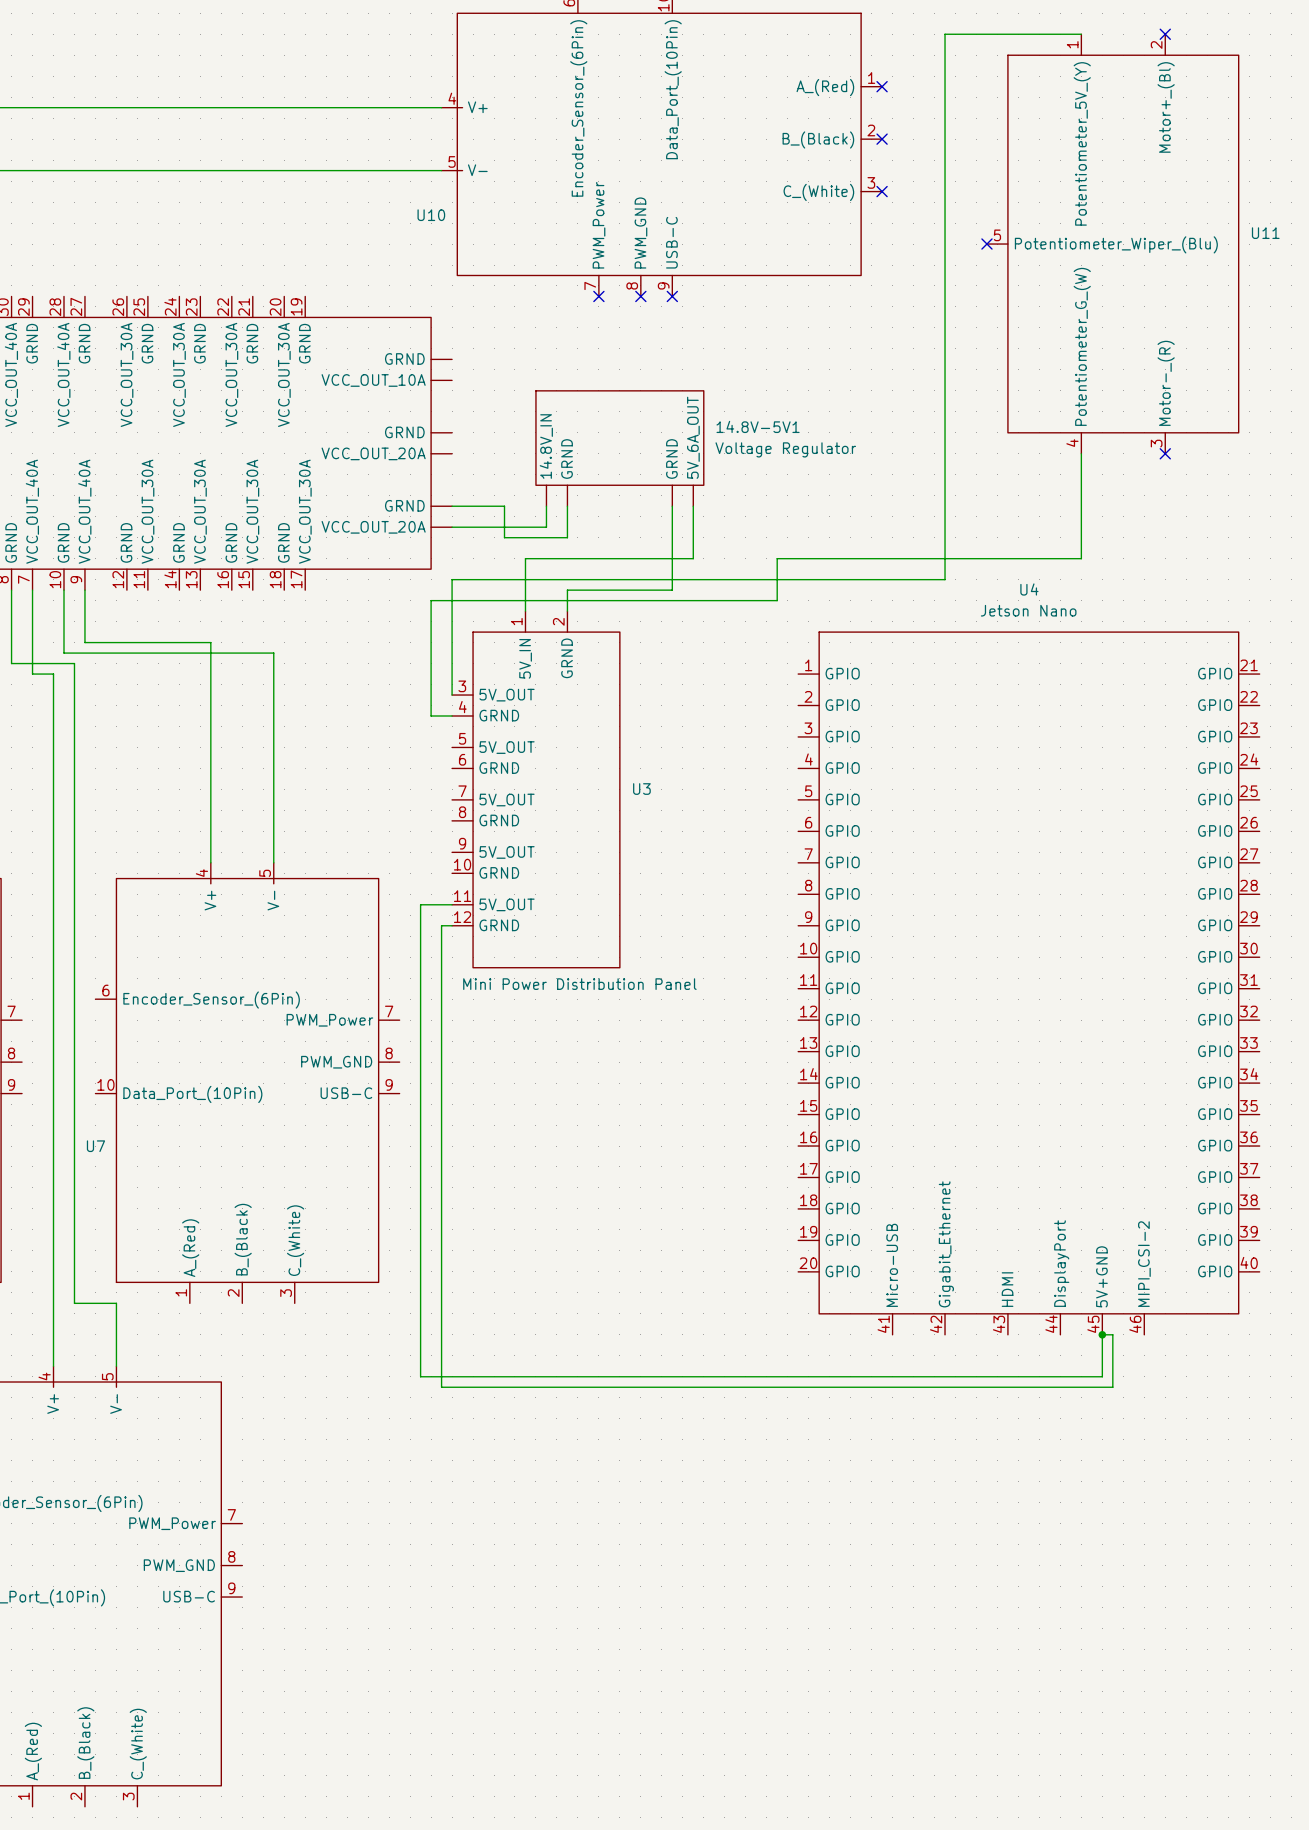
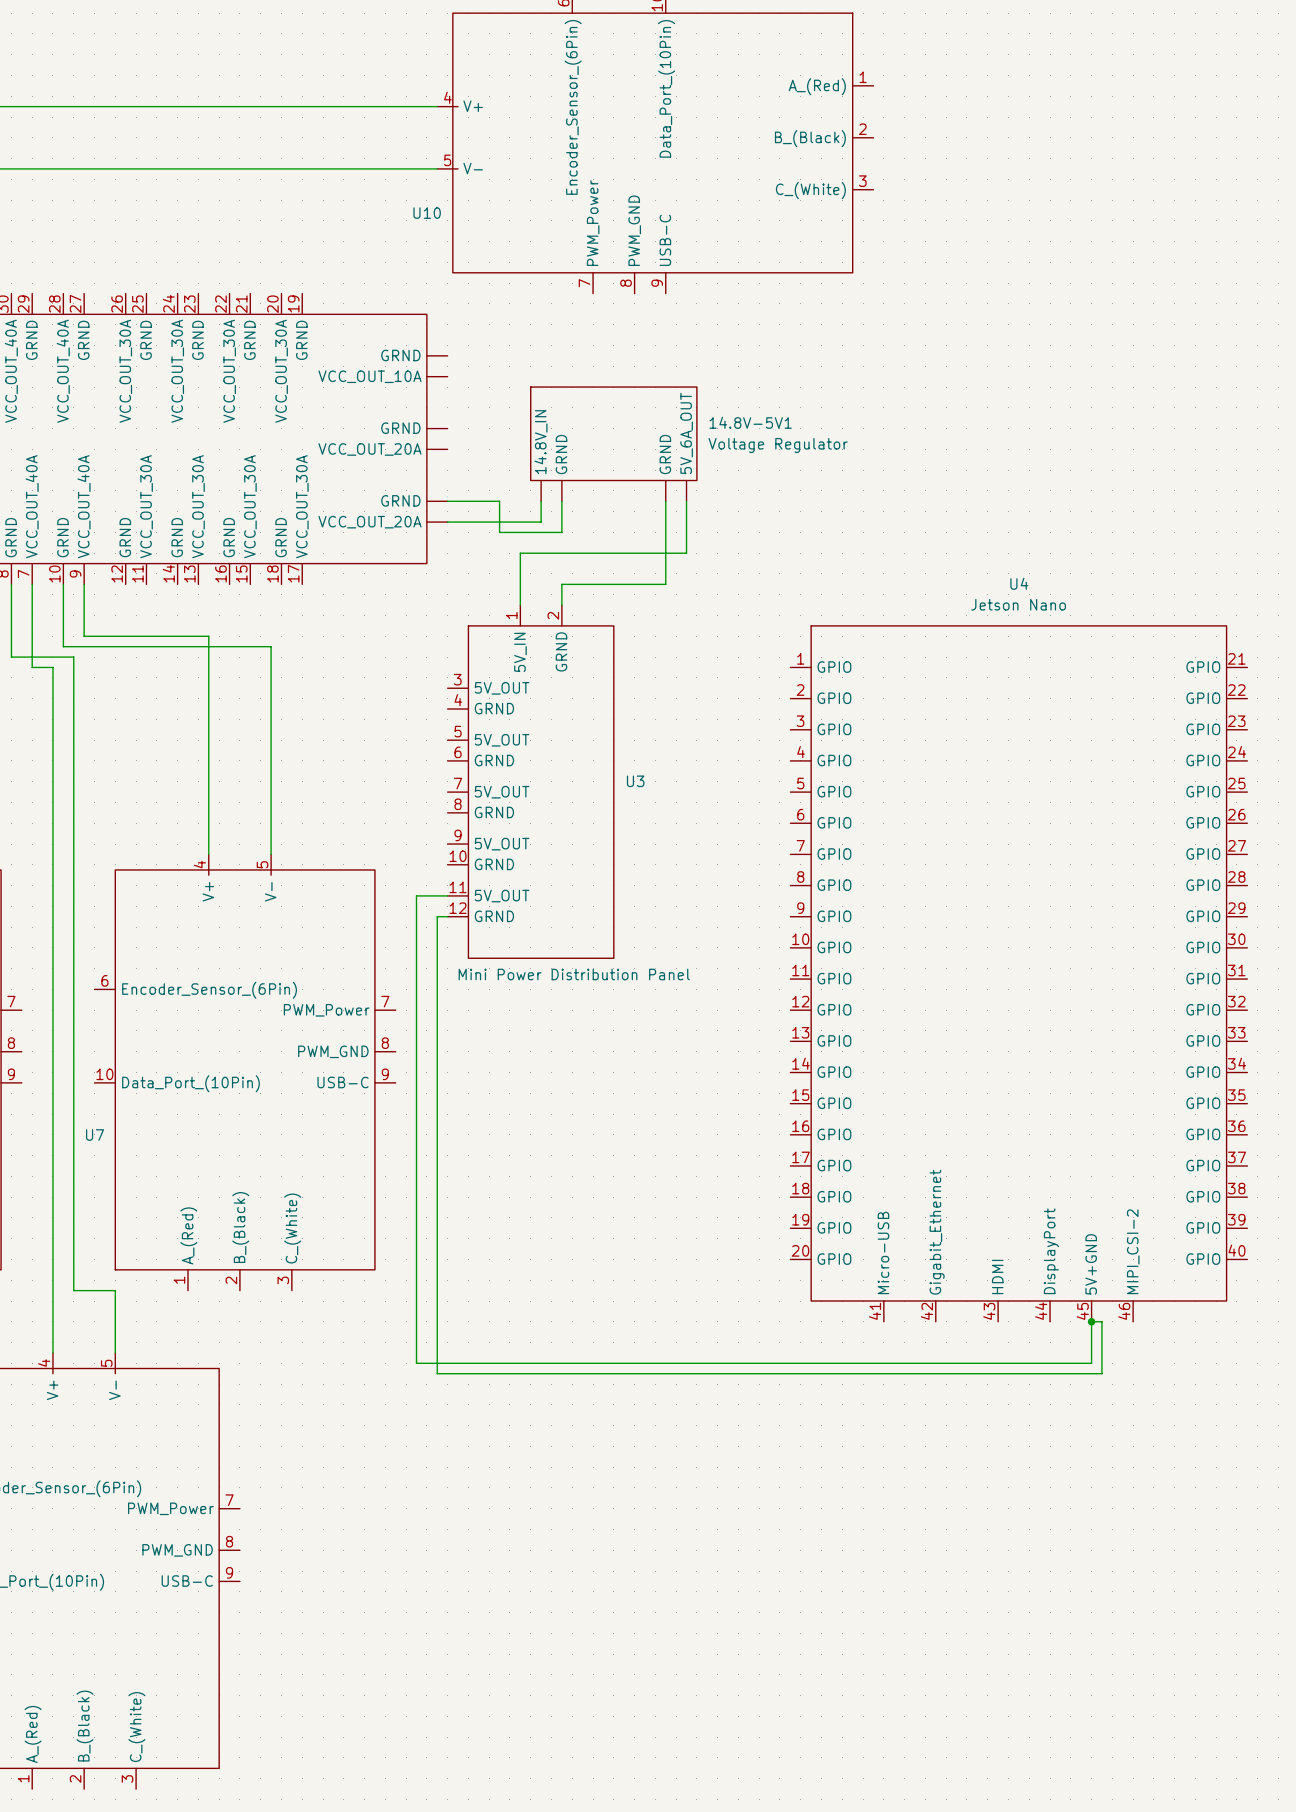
wire: (1081, 34) (945, 34) (945, 579) (452, 579) (452, 695) -> none
no-connect mark: (1165, 34) -> none
no-connect mark: (882, 86) -> none
no-connect mark: (882, 139) -> none
no-connect mark: (882, 191) -> none
no-connect mark: (986, 244) -> none
U11: (1112, 244) -> none
no-connect mark: (598, 296) -> none
no-connect mark: (640, 296) -> none
no-connect mark: (672, 296) -> none
wire: (1081, 453) (1081, 558) (777, 558) (777, 600) (431, 600) (431, 715) (452, 715) -> none
no-connect mark: (1165, 453) -> none

